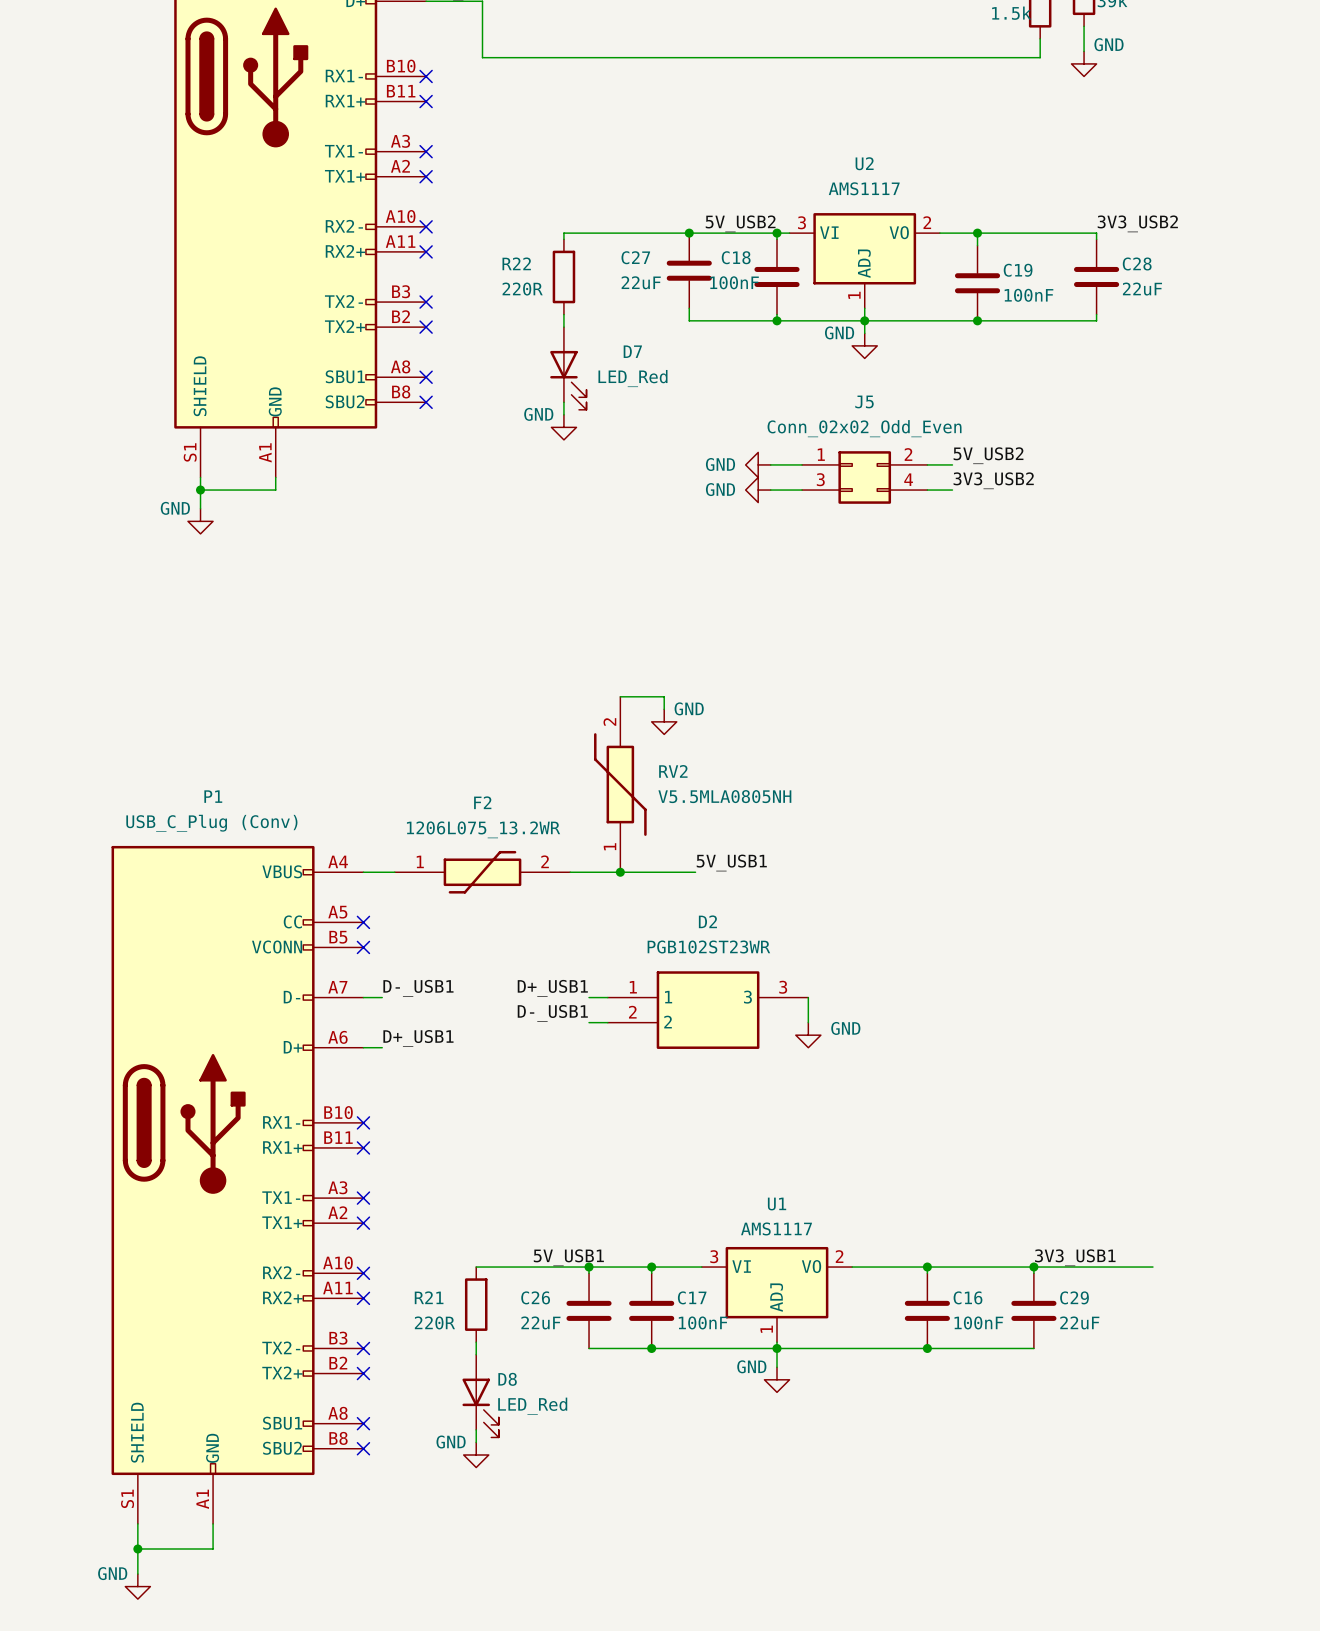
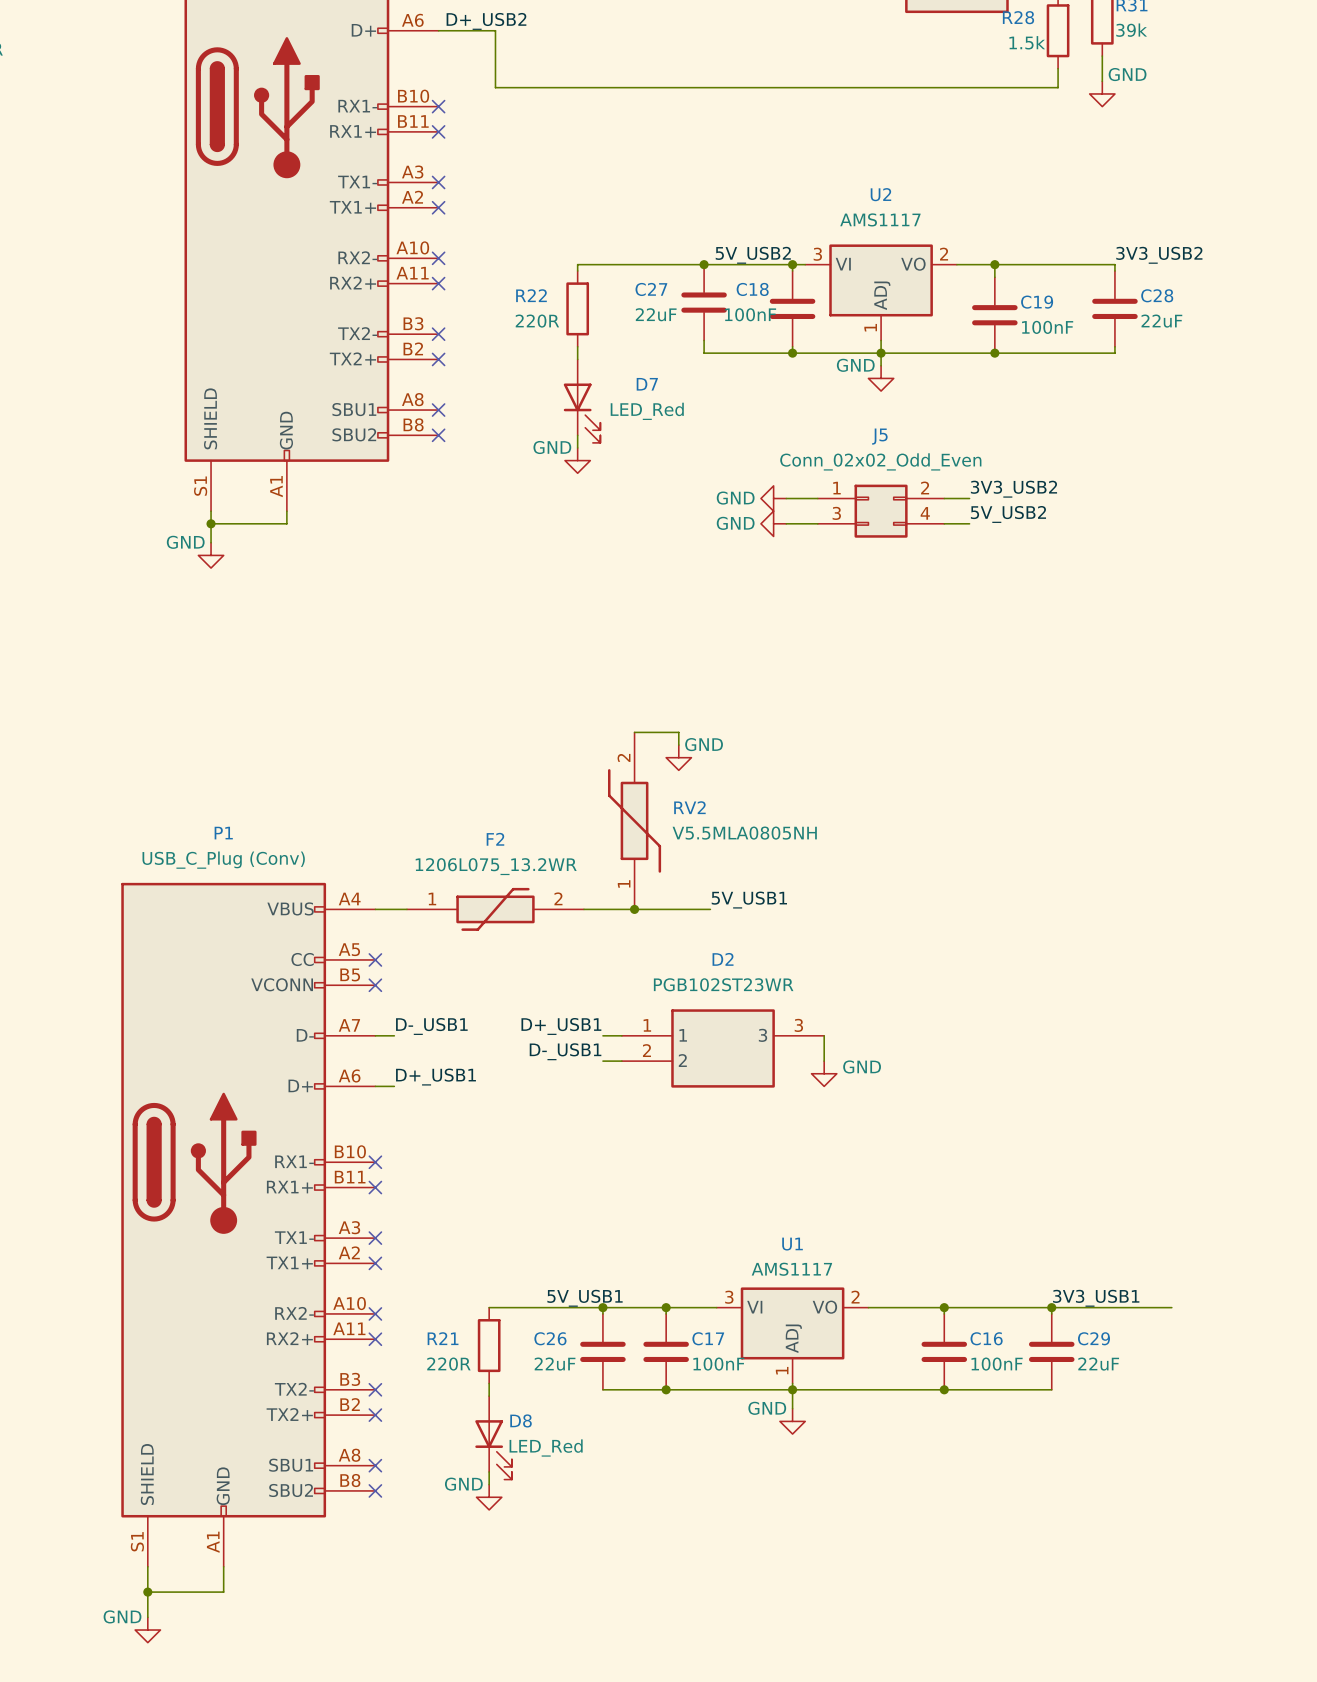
label: 5V_USB2 (988, 455) -> 3V3_USB2 (1013, 489)
label: 3V3_USB2 (993, 480) -> 5V_USB2 (1008, 514)

